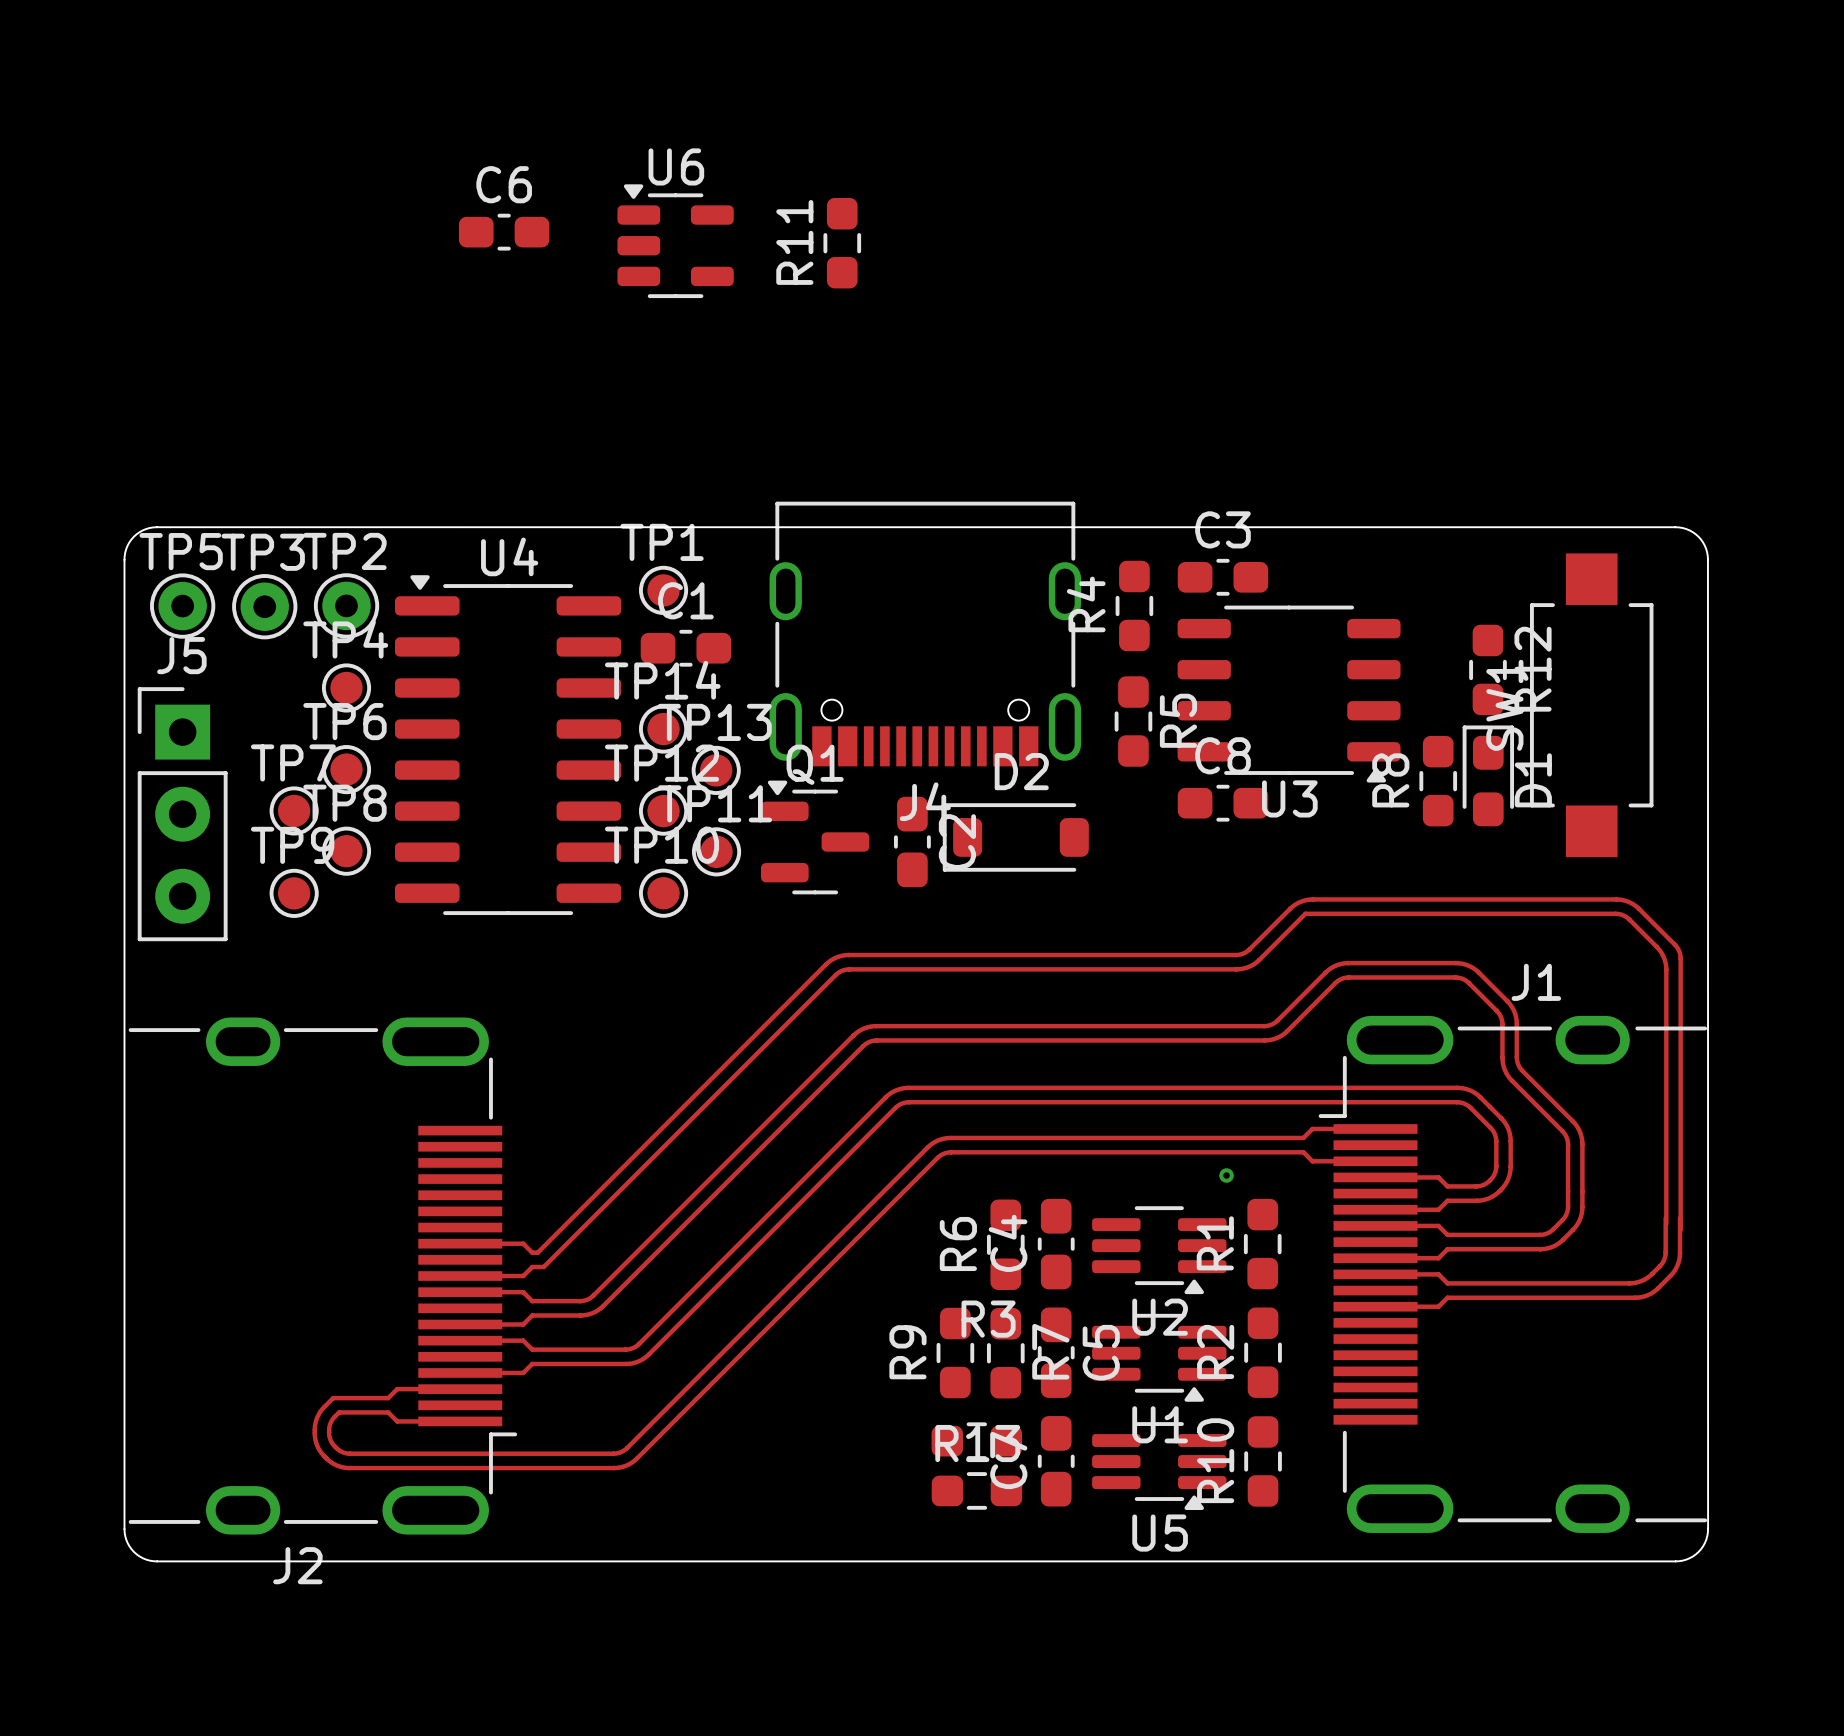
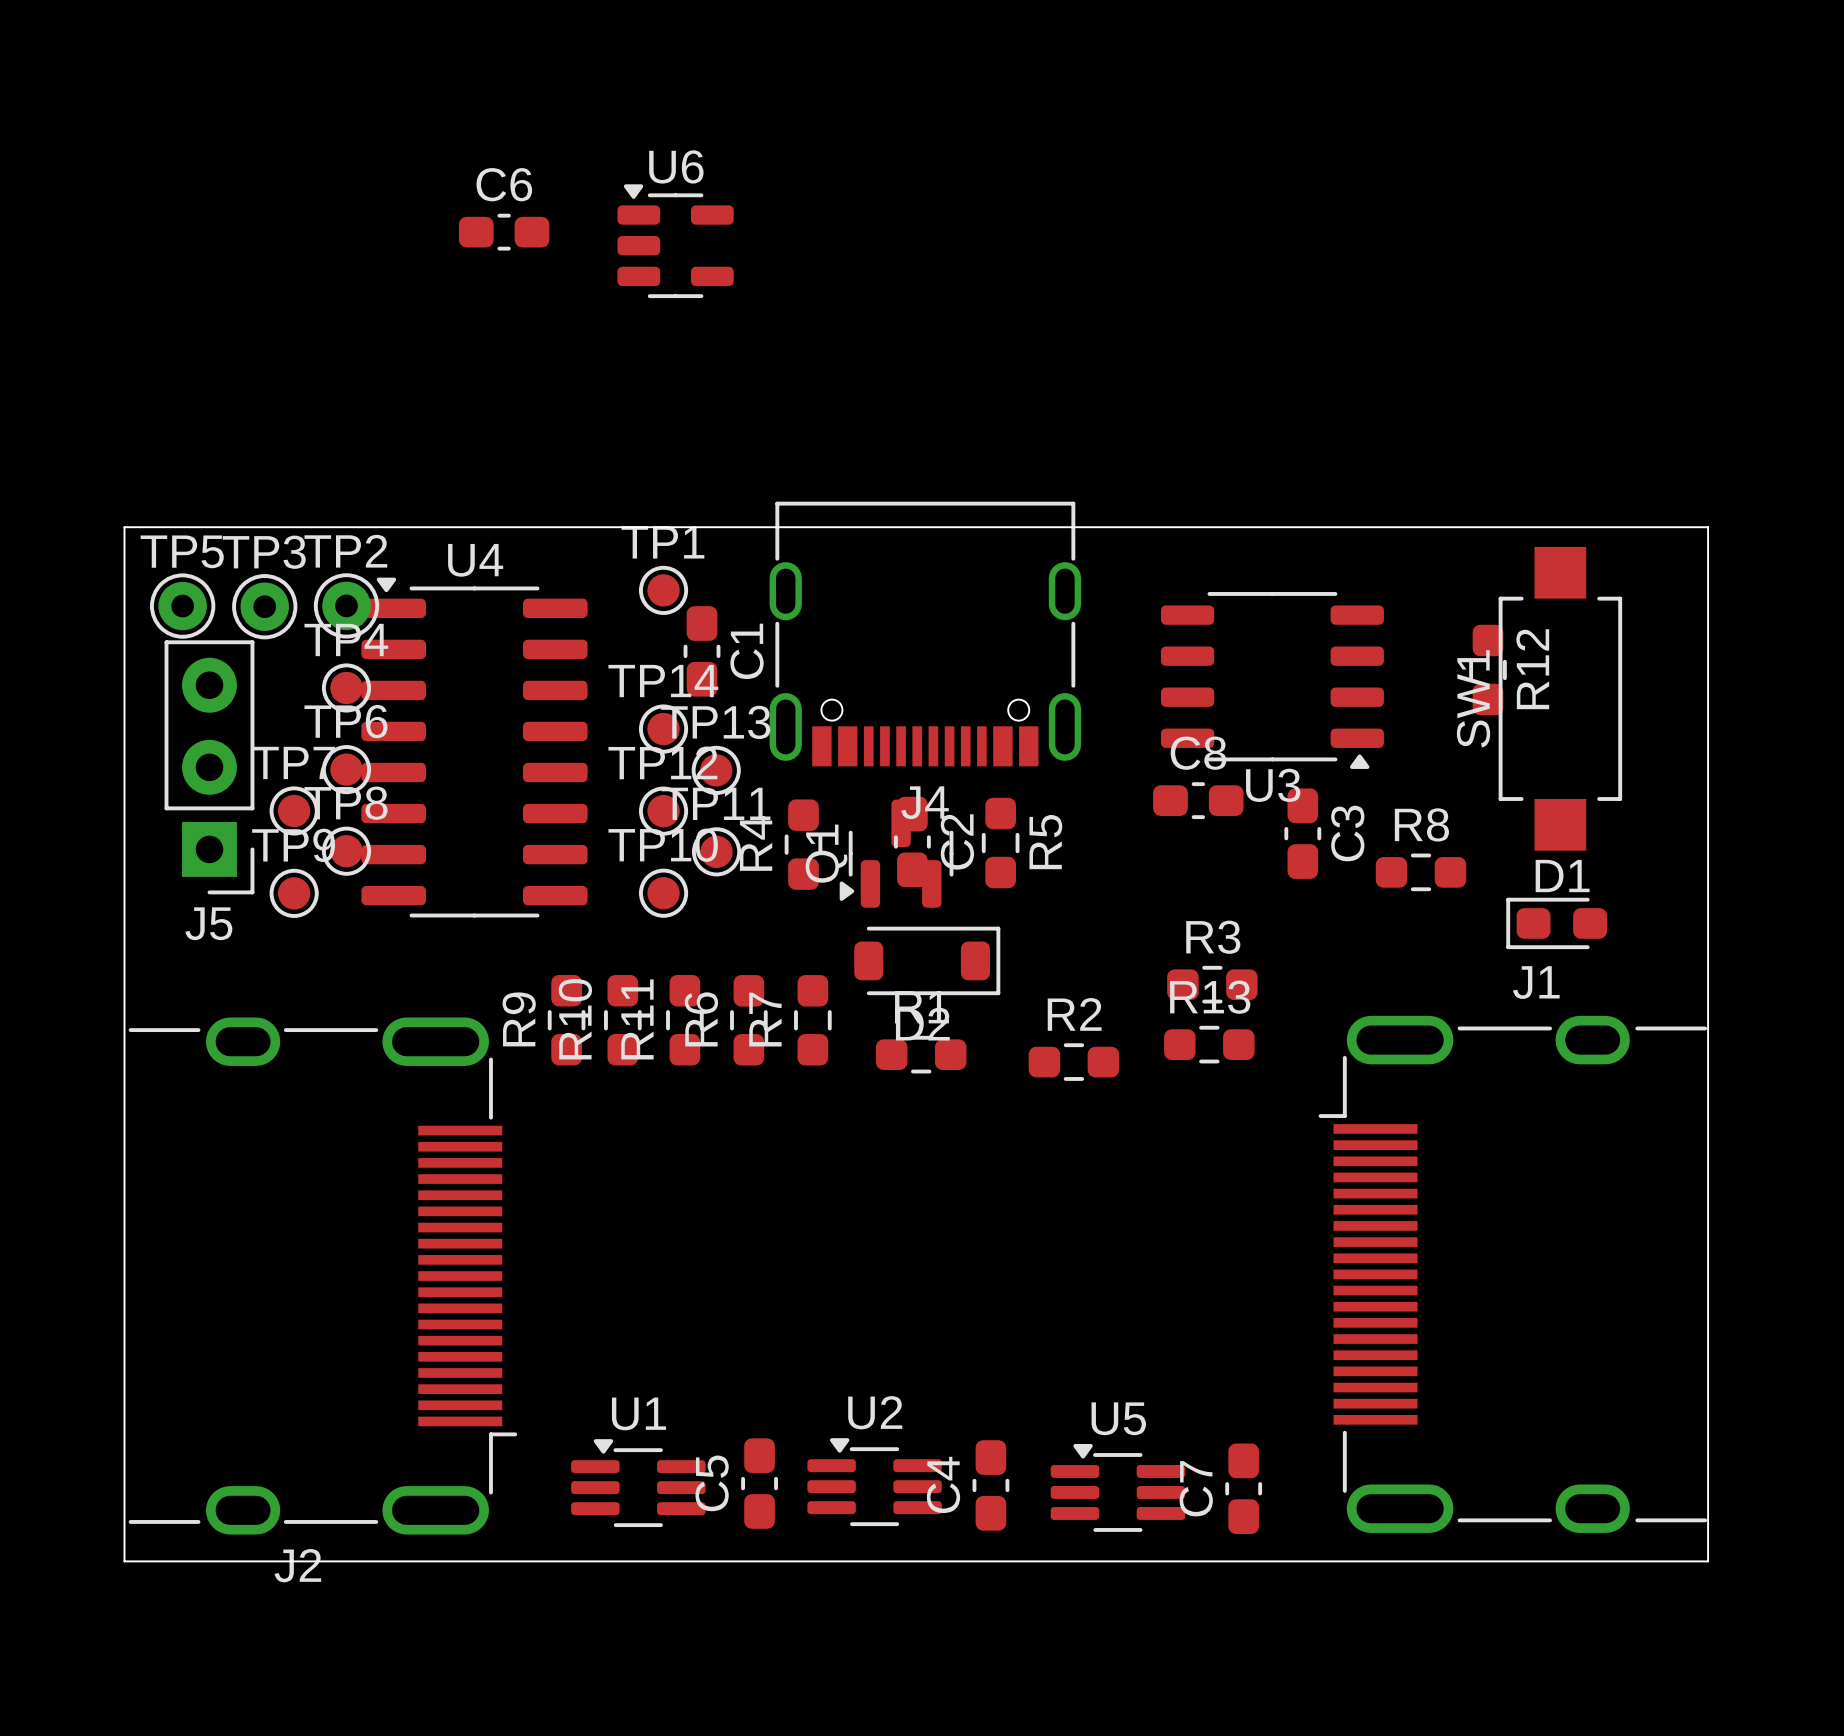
R11 position: (842, 243) -> (684, 1020)
board edge: (156, 527) (142, 530) (133, 536) (127, 545) (124, 559) -> (156, 527) (124, 527) (124, 559)
board edge: (1675, 527) (1689, 530) (1698, 536) (1704, 545) (1707, 559) (1708, 1528) (1704, 1542) (1698, 1551) (1689, 1558) (1675, 1561) -> (1675, 527) (1708, 527) (1708, 1561) (1675, 1561)
C3 rotation: 0° (1222, 577) -> 90° clockwise (1302, 833)
C3 position: (1222, 577) -> (1302, 833)
R4 position: (1134, 605) -> (803, 844)
C1 rotation: 0° (685, 648) -> 90° clockwise (702, 651)
U3 position: (1289, 694) -> (1272, 680)
SW1 position: (1591, 705) -> (1560, 698)
R5 position: (1133, 721) -> (1000, 843)
U4 position: (508, 745) -> (474, 747)
D1 rotation: 0° (1488, 775) -> 90° counterclockwise (1556, 923)
D1 position: (1488, 775) -> (1556, 923)
R8 rotation: 0° (1438, 781) -> 90° clockwise (1421, 872)
R8 position: (1438, 781) -> (1421, 872)
C8 position: (1222, 803) -> (1198, 800)
J5 rotation: 0° (182, 814) -> 180° (209, 767)
Q1 rotation: 0° (815, 837) -> 90° counterclockwise (896, 853)
Q1 position: (815, 837) -> (896, 853)
D2 rotation: 0° (1015, 837) -> 180° (927, 960)
D2 position: (1015, 837) -> (927, 960)
top track: (1489, 1106) (1472, 1091) (1457, 1087) (902, 1088) (885, 1097) (634, 1347) (625, 1349) (532, 1349) (523, 1340) (460, 1340) -> none
top track: (1490, 1107) (1505, 1123) (1510, 1137) (1510, 1173) (1505, 1184) (1497, 1193) (1479, 1200) (1447, 1200) (1438, 1209) (1375, 1209) -> none
top track: (1479, 1116) (1467, 1105) (1456, 1102) (903, 1103) (895, 1107) (643, 1358) (625, 1363) (532, 1363) (523, 1372) (460, 1372) -> none
top track: (1480, 1117) (1493, 1130) (1496, 1139) (1495, 1169) (1491, 1178) (1485, 1184) (1477, 1186) (1447, 1186) (1438, 1177) (1375, 1177) -> none
top track: (1375, 1128) (1312, 1128) (1303, 1137) (941, 1139) (927, 1147) (622, 1451) (613, 1453) (348, 1453) (336, 1448) (329, 1434) (330, 1423) (339, 1412) (388, 1412) (397, 1421) (460, 1421) -> none
top track: (1375, 1161) (1312, 1161) (1303, 1152) (945, 1153) (937, 1157) (636, 1458) (626, 1465) (614, 1468) (346, 1467) (328, 1460) (317, 1445) (314, 1433) (316, 1420) (322, 1409) (333, 1398) (388, 1398) (397, 1389) (460, 1389) -> none
via: (1226, 1175) -> none
top track: (1665, 1218) (1664, 1259) (1649, 1276) (1635, 1282) (1447, 1283) (1438, 1274) (1375, 1274) -> none
top track: (1680, 1218) (1679, 1256) (1677, 1265) (1672, 1273) (1658, 1288) (1644, 1296) (1447, 1297) (1438, 1306) (1375, 1306) -> none
top track: (1666, 1223) (1666, 966) (1658, 949) (1627, 918) (1615, 913) (1305, 913) (1256, 962) (1239, 969) (841, 970) (543, 1267) (532, 1267) (523, 1276) (460, 1276) -> none
top track: (1375, 1225) (1438, 1225) (1447, 1234) (1541, 1234) (1551, 1230) (1563, 1218) (1567, 1212) (1566, 1137) (1507, 1075) (1502, 1060) (1502, 1022) (1500, 1015) (1469, 983) (1460, 978) (1343, 978) (1335, 983) (1285, 1033) (1267, 1040) (871, 1041) (863, 1046) (598, 1310) (583, 1315) (532, 1315) (523, 1324) (460, 1324) -> none
top track: (1680, 1229) (1680, 956) (1676, 946) (1636, 906) (1625, 900) (1616, 899) (1312, 899) (1294, 904) (1248, 950) (1237, 954) (848, 955) (836, 957) (825, 964) (537, 1252) (532, 1252) (523, 1243) (460, 1243) -> none
R6 position: (1005, 1244) -> (748, 1020)
C4 position: (1056, 1244) -> (990, 1485)
R1 rotation: 0° (1262, 1244) -> 90° clockwise (921, 1054)
R1 position: (1262, 1244) -> (921, 1054)
U2 rotation: 0° (1159, 1250) -> 180° (874, 1482)
U2 position: (1159, 1250) -> (874, 1482)
top track: (1375, 1258) (1438, 1258) (1447, 1249) (1546, 1248) (1563, 1239) (1575, 1227) (1581, 1216) (1582, 1144) (1579, 1131) (1572, 1121) (1519, 1066) (1516, 1059) (1516, 1020) (1511, 1006) (1476, 970) (1465, 964) (1339, 964) (1325, 972) (1276, 1021) (1265, 1026) (866, 1027) (853, 1035) (590, 1297) (581, 1301) (532, 1301) (523, 1292) (460, 1292) -> none
R3 name position: R3 (988, 1319) -> R3 (1213, 937)
R7 name position: R7 (1050, 1351) -> R7 (765, 1019)
C5 position: (1056, 1352) -> (759, 1483)
C5 name position: C5 (1101, 1352) -> C5 (712, 1483)
R2 rotation: 0° (1263, 1352) -> 90° clockwise (1073, 1062)
R2 position: (1263, 1352) -> (1073, 1062)
R9 position: (955, 1353) -> (566, 1020)
R7 position: (1005, 1353) -> (812, 1020)
U1 rotation: 0° (1159, 1357) -> 180° (638, 1483)
U1 position: (1159, 1357) -> (638, 1483)
R3 position: (976, 1441) -> (1212, 984)
C7 position: (1056, 1461) -> (1243, 1488)
R10 position: (1263, 1461) -> (622, 1020)
U5 rotation: 0° (1159, 1466) -> 180° (1117, 1487)
R13 position: (976, 1490) -> (1209, 1044)
board edge: (124, 1529) (127, 1543) (134, 1552) (146, 1559) (157, 1561) -> (124, 1529) (124, 1561) (157, 1561)

